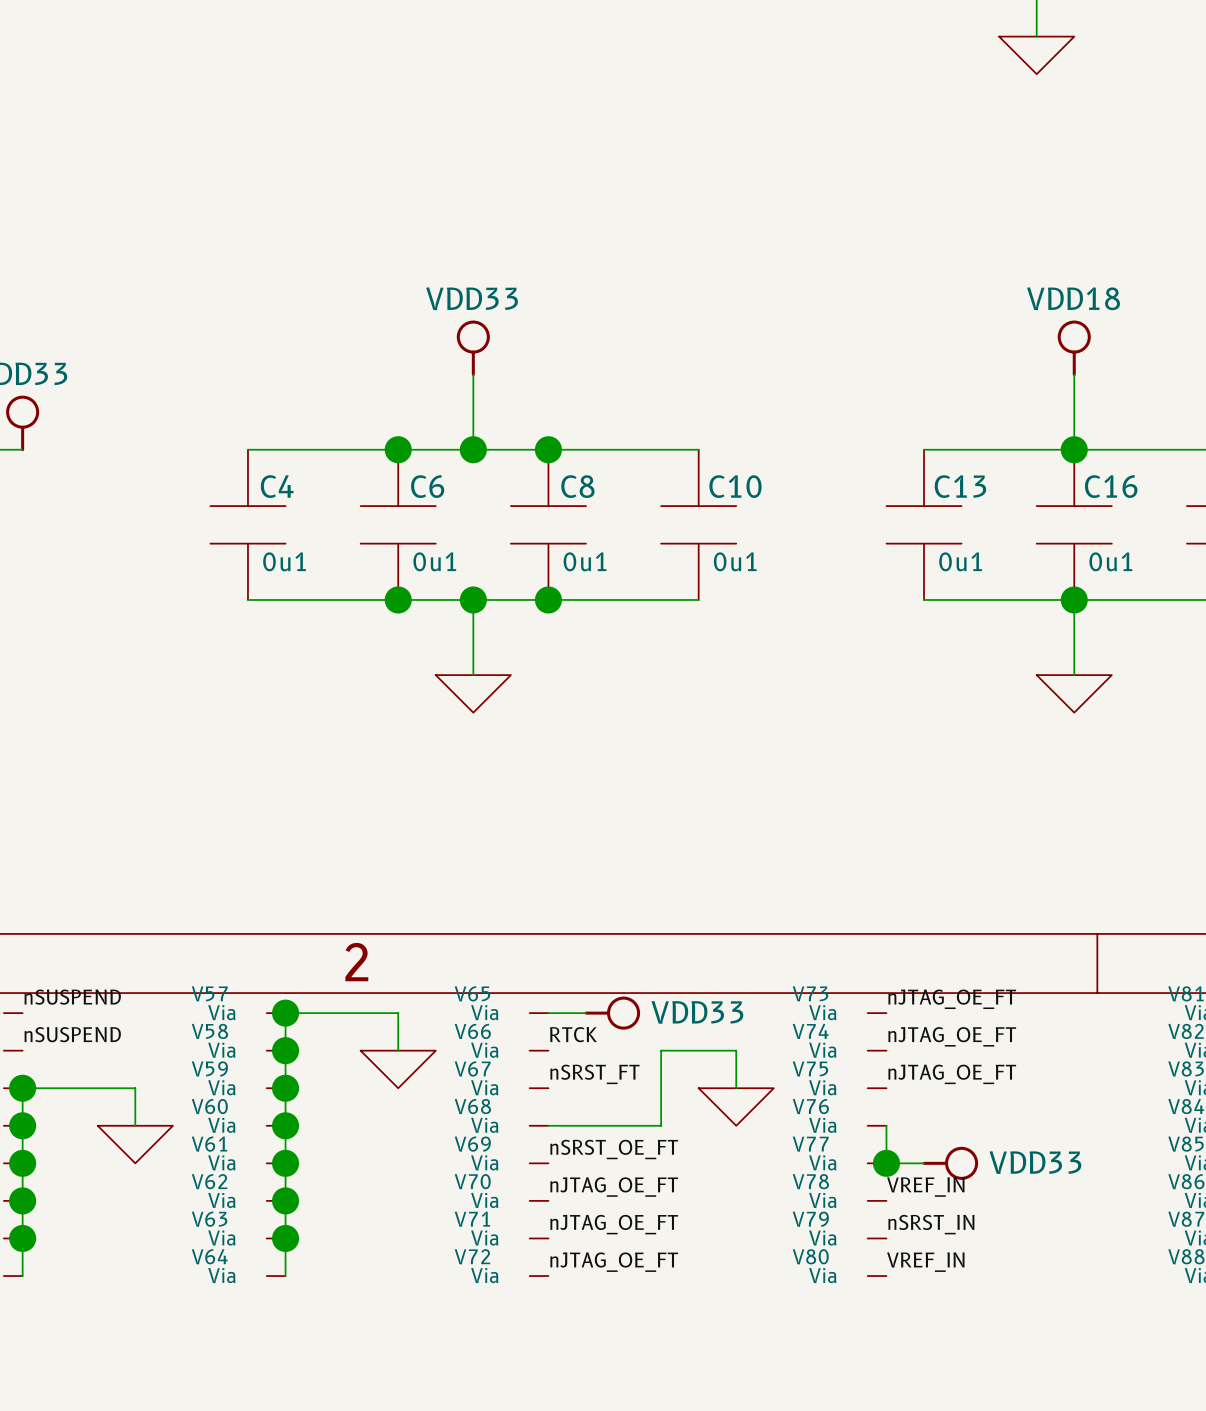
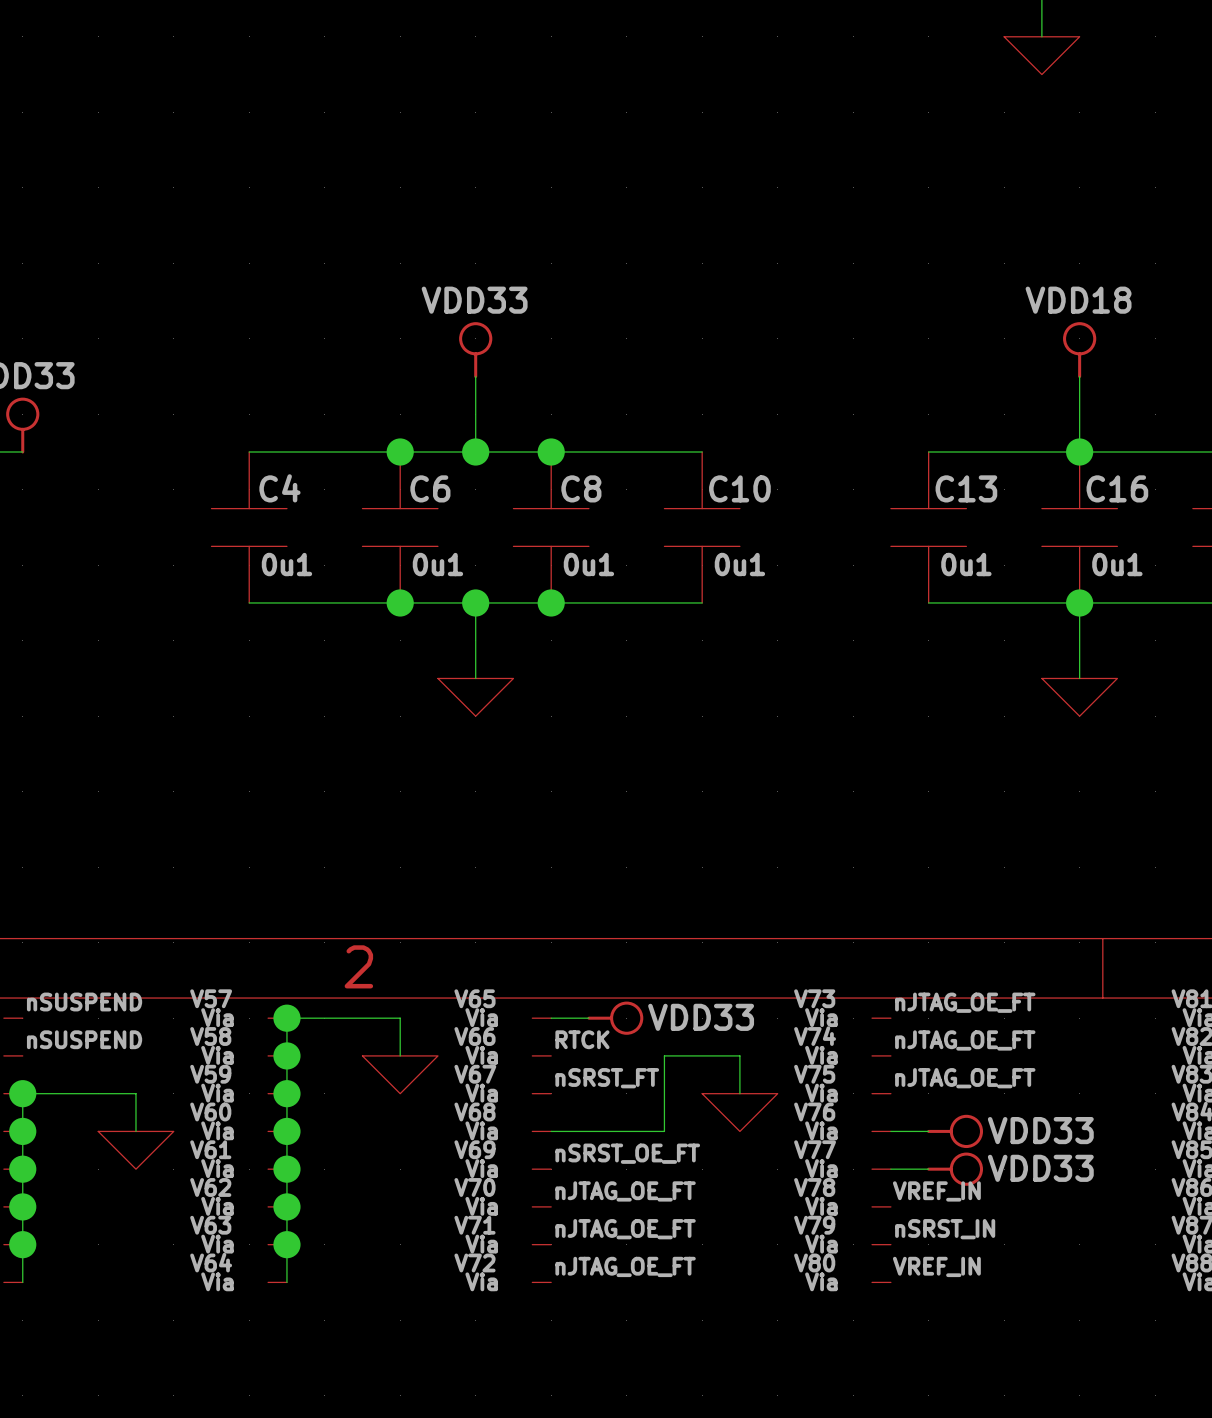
wire: (886, 1125) (886, 1163) -> (890, 1131) (928, 1131)
power symbol: none -> VDD33 (955, 1131)
junction: (886, 1163) -> none

